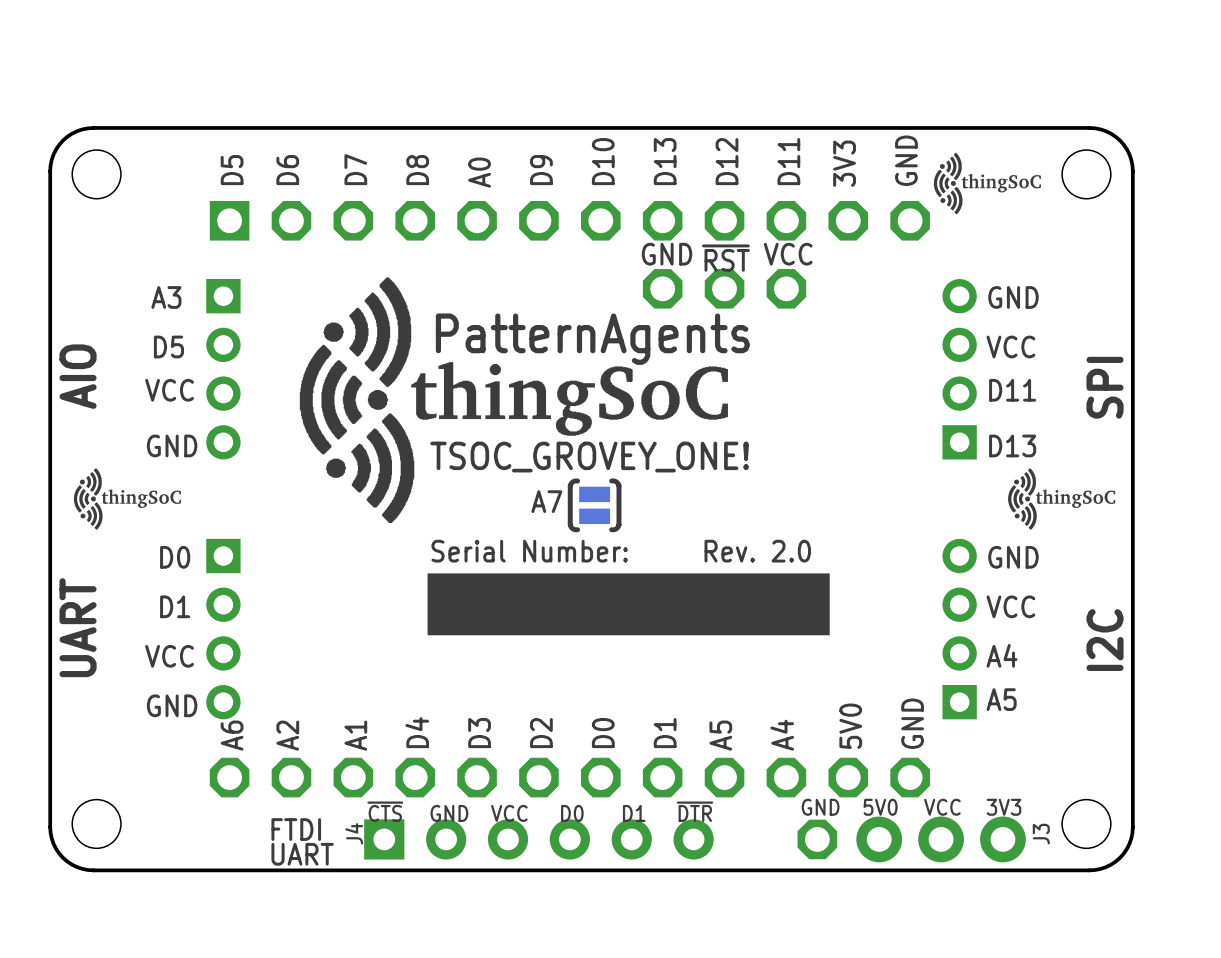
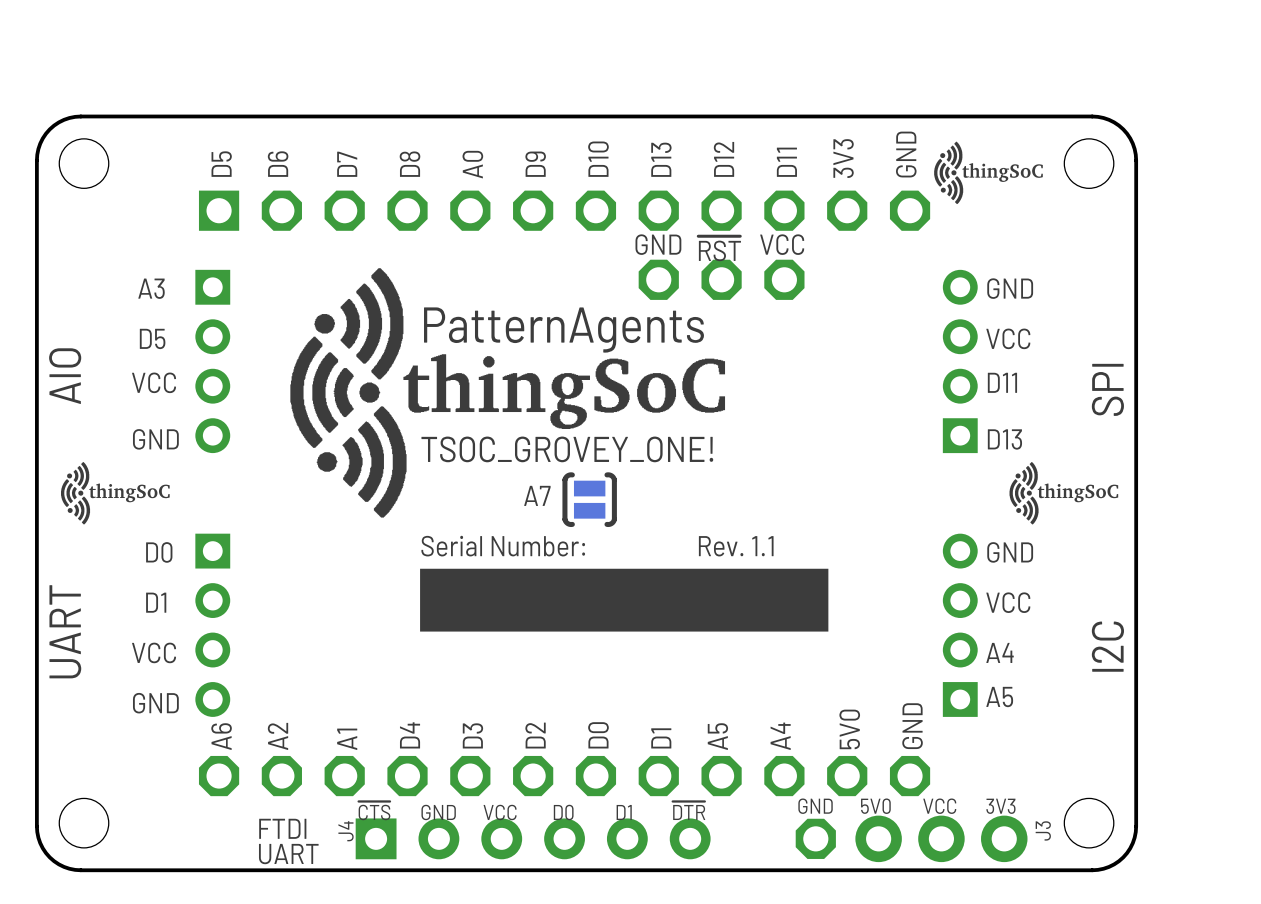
text: Rev. 2.0 (757, 551) -> Rev. 1.1 (736, 546)

